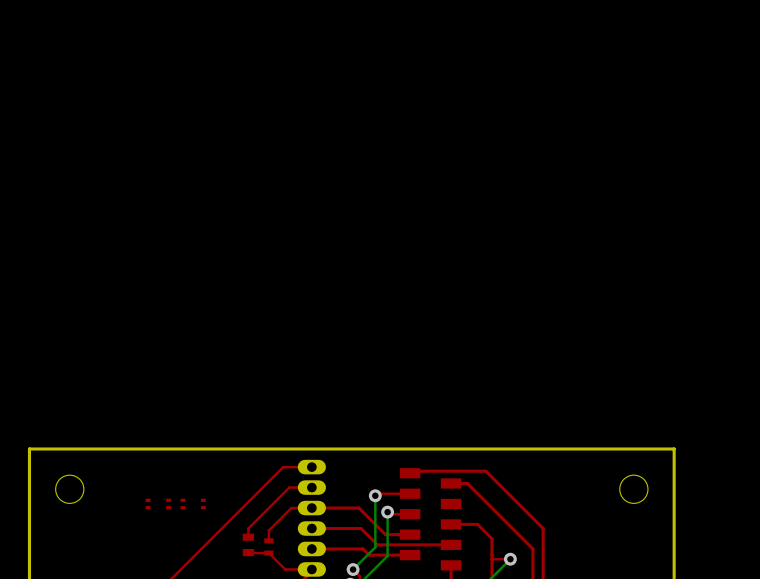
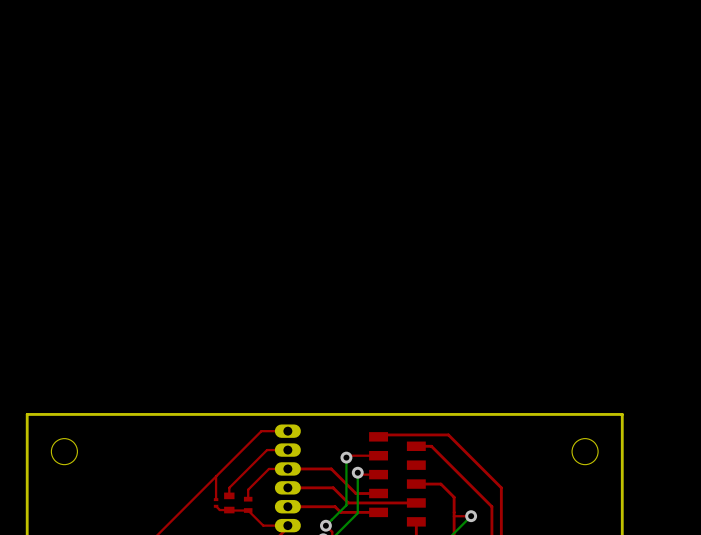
part: (148, 503) -> none
part: (168, 503) -> none
part: (182, 503) -> none
part: (203, 503) -> none
top track: none -> (216, 476) (216, 499)
part: none -> (216, 502)
top track: none -> (216, 506) (219, 510) (229, 510)

